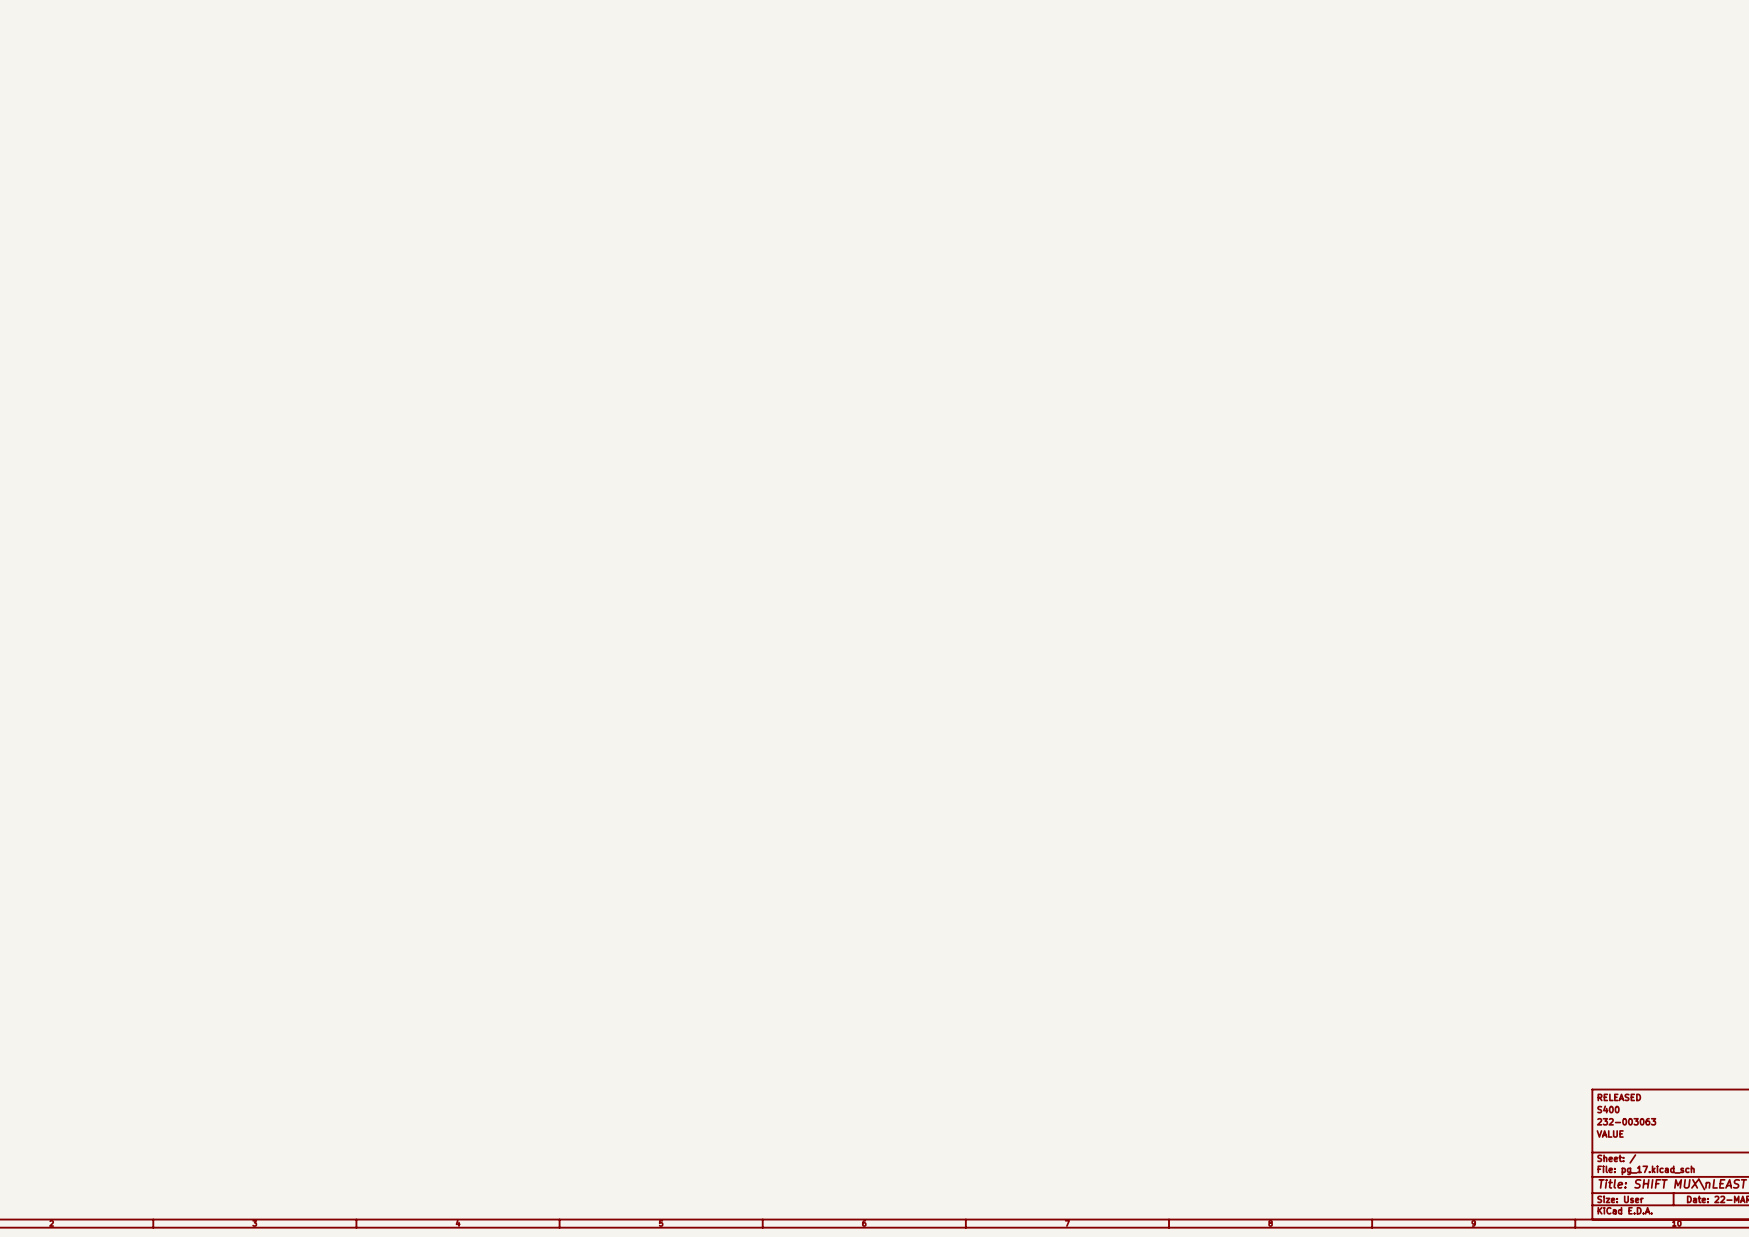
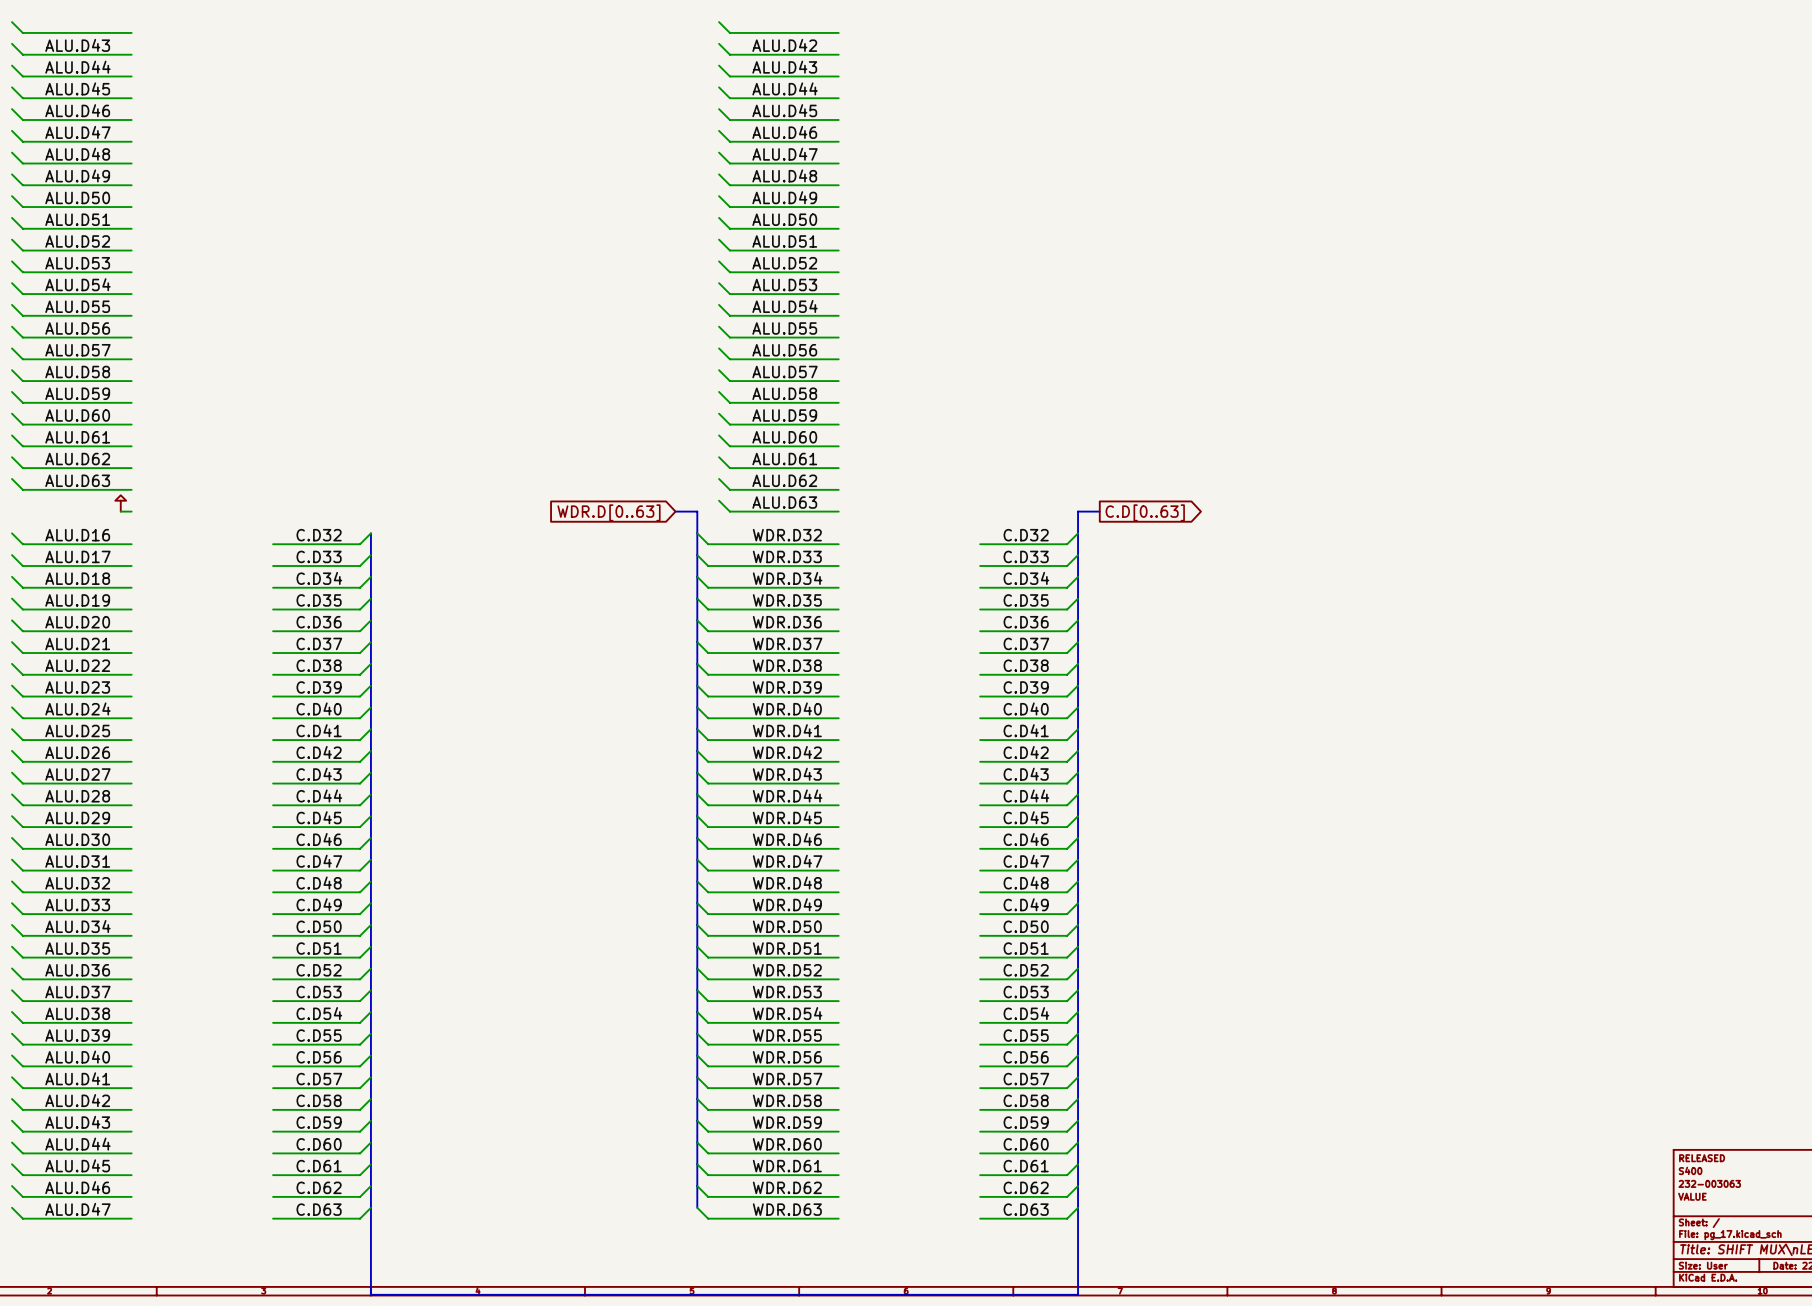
wire: none -> (11, 22) (22, 32) (131, 32)
wire: none -> (719, 22) (729, 32) (838, 32)
wire: none -> (11, 43) (22, 54) (131, 54)
wire: none -> (719, 43) (729, 54) (838, 54)
label: none -> ALU.D43 (77, 45)
label: none -> ALU.D42 (784, 45)
wire: none -> (11, 65) (22, 76) (131, 76)
wire: none -> (719, 65) (729, 76) (838, 76)
label: none -> ALU.D44 (77, 67)
label: none -> ALU.D43 (784, 67)
wire: none -> (11, 87) (22, 98) (131, 98)
wire: none -> (719, 87) (729, 98) (838, 98)
label: none -> ALU.D45 (77, 88)
label: none -> ALU.D44 (785, 88)
wire: none -> (11, 109) (22, 119) (131, 119)
wire: none -> (719, 109) (729, 119) (838, 119)
label: none -> ALU.D46 (77, 110)
label: none -> ALU.D45 (784, 110)
wire: none -> (11, 130) (22, 141) (131, 141)
wire: none -> (719, 130) (729, 141) (838, 141)
label: none -> ALU.D47 (77, 132)
label: none -> ALU.D46 (784, 132)
wire: none -> (11, 152) (22, 163) (131, 163)
wire: none -> (719, 152) (729, 163) (838, 163)
label: none -> ALU.D48 (77, 154)
label: none -> ALU.D47 (785, 154)
wire: none -> (11, 174) (22, 185) (131, 185)
wire: none -> (719, 174) (729, 185) (838, 185)
label: none -> ALU.D49 (77, 175)
label: none -> ALU.D48 (784, 175)
wire: none -> (11, 196) (22, 207) (131, 207)
wire: none -> (719, 196) (729, 207) (838, 207)
label: none -> ALU.D50 (77, 197)
label: none -> ALU.D49 (784, 197)
wire: none -> (11, 217) (22, 228) (131, 228)
wire: none -> (719, 217) (729, 228) (838, 228)
label: none -> ALU.D51 (77, 219)
label: none -> ALU.D50 (784, 219)
wire: none -> (11, 239) (22, 250) (131, 250)
wire: none -> (719, 239) (729, 250) (838, 250)
label: none -> ALU.D52 (77, 241)
label: none -> ALU.D51 (784, 241)
wire: none -> (11, 261) (22, 272) (131, 272)
wire: none -> (719, 261) (729, 272) (838, 272)
label: none -> ALU.D53 (77, 263)
label: none -> ALU.D52 (784, 263)
wire: none -> (11, 283) (22, 294) (131, 294)
wire: none -> (719, 283) (729, 294) (838, 294)
label: none -> ALU.D54 (77, 284)
label: none -> ALU.D53 (784, 284)
wire: none -> (11, 304) (22, 315) (131, 315)
wire: none -> (719, 304) (729, 315) (838, 315)
label: none -> ALU.D55 (77, 306)
label: none -> ALU.D54 (785, 306)
wire: none -> (11, 326) (22, 337) (131, 337)
wire: none -> (719, 326) (729, 337) (838, 337)
label: none -> ALU.D56 (77, 328)
label: none -> ALU.D55 (784, 328)
wire: none -> (11, 348) (22, 359) (131, 359)
wire: none -> (719, 348) (729, 359) (838, 359)
label: none -> ALU.D57 (77, 350)
label: none -> ALU.D56 (784, 350)
wire: none -> (11, 370) (22, 381) (131, 381)
wire: none -> (719, 370) (729, 381) (838, 381)
label: none -> ALU.D58 (77, 372)
label: none -> ALU.D57 (785, 372)
wire: none -> (11, 391) (22, 402) (131, 402)
wire: none -> (719, 391) (729, 402) (838, 402)
label: none -> ALU.D59 (77, 393)
label: none -> ALU.D58 (784, 393)
wire: none -> (11, 413) (22, 424) (131, 424)
wire: none -> (719, 413) (729, 424) (838, 424)
label: none -> ALU.D60 (77, 415)
label: none -> ALU.D59 (784, 415)
wire: none -> (11, 435) (22, 446) (131, 446)
wire: none -> (719, 435) (729, 446) (838, 446)
label: none -> ALU.D61 (77, 437)
label: none -> ALU.D60 (784, 437)
wire: none -> (11, 457) (22, 468) (131, 468)
wire: none -> (719, 457) (729, 468) (838, 468)
label: none -> ALU.D62 (77, 459)
label: none -> ALU.D61 (784, 459)
wire: none -> (11, 478) (22, 489) (131, 489)
wire: none -> (719, 478) (729, 489) (838, 489)
label: none -> ALU.D63 (77, 480)
label: none -> ALU.D62 (784, 480)
wire: none -> (719, 500) (729, 511) (838, 511)
label: none -> ALU.D63 (784, 502)
power symbol: none -> (120, 503)
wire: none -> (120, 511) (131, 511)
bus: none -> (675, 511) (697, 511) (697, 1207)
bus: none -> (1099, 511) (1078, 511) (1078, 1294) (370, 1294) (370, 533)
global label: none -> WDR.D[0..63] (609, 512)
global label: none -> C.D[0..63] (1145, 512)
wire: none -> (11, 533) (22, 544) (131, 544)
wire: none -> (370, 533) (360, 544) (273, 544)
wire: none -> (697, 533) (708, 544) (838, 544)
wire: none -> (1078, 533) (1067, 544) (980, 544)
label: none -> ALU.D16 (77, 535)
label: none -> C.D32 (319, 535)
label: none -> WDR.D32 (787, 535)
label: none -> C.D32 (1026, 535)
wire: none -> (11, 555) (22, 565) (131, 565)
wire: none -> (370, 555) (360, 565) (273, 565)
wire: none -> (697, 555) (708, 565) (838, 565)
wire: none -> (1078, 555) (1067, 565) (980, 565)
label: none -> ALU.D17 (77, 556)
label: none -> C.D33 (319, 556)
label: none -> WDR.D33 (787, 556)
label: none -> C.D33 (1026, 556)
wire: none -> (11, 576) (22, 587) (131, 587)
wire: none -> (370, 576) (360, 587) (273, 587)
wire: none -> (697, 576) (708, 587) (838, 587)
wire: none -> (1078, 576) (1067, 587) (980, 587)
label: none -> ALU.D18 (77, 578)
label: none -> C.D34 (319, 578)
label: none -> WDR.D34 (787, 578)
label: none -> C.D34 (1026, 578)
wire: none -> (11, 598) (22, 609) (131, 609)
wire: none -> (370, 598) (360, 609) (273, 609)
wire: none -> (697, 598) (708, 609) (838, 609)
wire: none -> (1078, 598) (1067, 609) (980, 609)
label: none -> ALU.D19 (77, 600)
label: none -> C.D35 (319, 600)
label: none -> WDR.D35 (787, 600)
label: none -> C.D35 (1026, 600)
wire: none -> (11, 620) (22, 631) (131, 631)
wire: none -> (370, 620) (360, 631) (273, 631)
wire: none -> (697, 620) (708, 631) (838, 631)
wire: none -> (1078, 620) (1067, 631) (980, 631)
label: none -> ALU.D20 (77, 622)
label: none -> C.D36 (319, 622)
label: none -> WDR.D36 (787, 622)
label: none -> C.D36 (1026, 622)
wire: none -> (11, 642) (22, 653) (131, 653)
wire: none -> (370, 642) (360, 653) (273, 653)
wire: none -> (697, 642) (708, 653) (838, 653)
wire: none -> (1078, 642) (1067, 653) (980, 653)
label: none -> ALU.D21 (77, 643)
label: none -> C.D37 (319, 643)
label: none -> WDR.D37 (787, 643)
label: none -> C.D37 (1026, 643)
wire: none -> (11, 663) (22, 674) (131, 674)
wire: none -> (370, 663) (360, 674) (273, 674)
wire: none -> (697, 663) (708, 674) (838, 674)
wire: none -> (1078, 663) (1067, 674) (980, 674)
label: none -> ALU.D22 (77, 665)
label: none -> C.D38 (319, 665)
label: none -> WDR.D38 (787, 665)
label: none -> C.D38 (1026, 665)
wire: none -> (11, 685) (22, 696) (131, 696)
wire: none -> (370, 685) (360, 696) (273, 696)
wire: none -> (697, 685) (708, 696) (838, 696)
wire: none -> (1078, 685) (1067, 696) (980, 696)
label: none -> ALU.D23 (77, 687)
label: none -> C.D39 (319, 687)
label: none -> WDR.D39 (787, 687)
label: none -> C.D39 (1026, 687)
wire: none -> (11, 707) (22, 718) (131, 718)
wire: none -> (370, 707) (360, 718) (273, 718)
wire: none -> (697, 707) (708, 718) (838, 718)
wire: none -> (1078, 707) (1067, 718) (980, 718)
label: none -> ALU.D24 (77, 708)
label: none -> C.D40 (319, 708)
label: none -> WDR.D40 (787, 708)
label: none -> C.D40 (1026, 708)
wire: none -> (11, 729) (22, 740) (131, 740)
wire: none -> (370, 729) (360, 740) (273, 740)
wire: none -> (697, 729) (708, 740) (838, 740)
wire: none -> (1078, 729) (1067, 740) (980, 740)
label: none -> C.D41 (319, 730)
label: none -> WDR.D41 (787, 730)
label: none -> C.D41 (1026, 730)
label: none -> ALU.D25 (77, 730)
wire: none -> (11, 750) (22, 761) (131, 761)
wire: none -> (370, 750) (360, 761) (273, 761)
wire: none -> (697, 750) (708, 761) (838, 761)
wire: none -> (1078, 750) (1067, 761) (980, 761)
label: none -> ALU.D26 (77, 752)
label: none -> C.D42 (319, 752)
label: none -> WDR.D42 (787, 752)
label: none -> C.D42 (1026, 752)
wire: none -> (11, 772) (22, 783) (131, 783)
wire: none -> (370, 772) (360, 783) (273, 783)
wire: none -> (697, 772) (708, 783) (838, 783)
wire: none -> (1078, 772) (1067, 783) (980, 783)
label: none -> ALU.D27 (77, 774)
label: none -> C.D43 (319, 774)
label: none -> WDR.D43 (787, 774)
label: none -> C.D43 (1026, 774)
wire: none -> (11, 794) (22, 805) (131, 805)
wire: none -> (370, 794) (360, 805) (273, 805)
wire: none -> (697, 794) (708, 805) (838, 805)
wire: none -> (1078, 794) (1067, 805) (980, 805)
label: none -> C.D44 (319, 795)
label: none -> WDR.D44 (787, 795)
label: none -> C.D44 (1026, 795)
label: none -> ALU.D28 (77, 796)
wire: none -> (11, 816) (22, 827) (131, 827)
wire: none -> (370, 816) (360, 827) (273, 827)
wire: none -> (697, 816) (708, 827) (838, 827)
wire: none -> (1078, 816) (1067, 827) (980, 827)
label: none -> ALU.D29 (77, 818)
label: none -> C.D45 (319, 817)
label: none -> WDR.D45 (787, 817)
label: none -> C.D45 (1026, 817)
wire: none -> (11, 837) (22, 848) (131, 848)
wire: none -> (370, 837) (360, 848) (273, 848)
wire: none -> (697, 837) (708, 848) (838, 848)
wire: none -> (1078, 837) (1067, 848) (980, 848)
label: none -> ALU.D30 (77, 839)
label: none -> C.D46 (319, 839)
label: none -> WDR.D46 (787, 839)
label: none -> C.D46 (1026, 839)
wire: none -> (11, 859) (22, 870) (131, 870)
wire: none -> (370, 859) (360, 870) (273, 870)
wire: none -> (697, 859) (708, 870) (838, 870)
wire: none -> (1078, 859) (1067, 870) (980, 870)
label: none -> ALU.D31 (77, 861)
label: none -> C.D47 (319, 861)
label: none -> WDR.D47 (787, 861)
label: none -> C.D47 (1026, 861)
wire: none -> (11, 881) (22, 892) (131, 892)
wire: none -> (370, 881) (360, 892) (273, 892)
wire: none -> (697, 881) (708, 892) (838, 892)
wire: none -> (1078, 881) (1067, 892) (980, 892)
label: none -> ALU.D32 (77, 883)
label: none -> C.D48 (319, 883)
label: none -> WDR.D48 (787, 883)
label: none -> C.D48 (1026, 883)
wire: none -> (11, 903) (22, 914) (131, 914)
wire: none -> (370, 903) (360, 914) (273, 914)
wire: none -> (697, 903) (708, 914) (838, 914)
wire: none -> (1078, 903) (1067, 914) (980, 914)
label: none -> C.D49 (319, 904)
label: none -> WDR.D49 (787, 904)
label: none -> C.D49 (1026, 904)
label: none -> ALU.D33 (77, 905)
wire: none -> (11, 924) (22, 935) (131, 935)
wire: none -> (370, 924) (360, 935) (273, 935)
wire: none -> (697, 924) (708, 935) (838, 935)
wire: none -> (1078, 924) (1067, 935) (980, 935)
label: none -> ALU.D34 (77, 926)
label: none -> C.D50 (319, 926)
label: none -> WDR.D50 (787, 926)
label: none -> C.D50 (1026, 926)
wire: none -> (11, 946) (22, 957) (131, 957)
wire: none -> (370, 946) (360, 957) (273, 957)
wire: none -> (697, 946) (708, 957) (838, 957)
wire: none -> (1078, 946) (1067, 957) (980, 957)
label: none -> ALU.D35 (77, 948)
label: none -> C.D51 (319, 948)
label: none -> WDR.D51 (787, 948)
label: none -> C.D51 (1026, 948)
wire: none -> (11, 968) (22, 979) (131, 979)
wire: none -> (370, 968) (360, 979) (273, 979)
wire: none -> (697, 968) (708, 979) (838, 979)
wire: none -> (1078, 968) (1067, 979) (980, 979)
label: none -> ALU.D36 (77, 970)
label: none -> C.D52 (319, 970)
label: none -> WDR.D52 (787, 970)
label: none -> C.D52 (1026, 970)
wire: none -> (11, 990) (22, 1001) (131, 1001)
wire: none -> (370, 990) (360, 1001) (273, 1001)
wire: none -> (697, 990) (708, 1001) (838, 1001)
wire: none -> (1078, 990) (1067, 1001) (980, 1001)
label: none -> ALU.D37 (77, 992)
label: none -> C.D53 (319, 992)
label: none -> WDR.D53 (787, 992)
label: none -> C.D53 (1026, 992)
wire: none -> (11, 1011) (22, 1022) (131, 1022)
wire: none -> (370, 1011) (360, 1022) (273, 1022)
wire: none -> (697, 1011) (708, 1022) (838, 1022)
wire: none -> (1078, 1011) (1067, 1022) (980, 1022)
label: none -> ALU.D38 (77, 1013)
label: none -> C.D54 (319, 1013)
label: none -> WDR.D54 (787, 1013)
label: none -> C.D54 (1026, 1013)
wire: none -> (11, 1033) (22, 1044) (131, 1044)
wire: none -> (370, 1033) (360, 1044) (273, 1044)
wire: none -> (697, 1033) (708, 1044) (838, 1044)
wire: none -> (1078, 1033) (1067, 1044) (980, 1044)
label: none -> ALU.D39 (77, 1035)
label: none -> C.D55 (319, 1035)
label: none -> WDR.D55 (787, 1035)
label: none -> C.D55 (1026, 1035)
wire: none -> (11, 1055) (22, 1066) (131, 1066)
wire: none -> (370, 1055) (360, 1066) (273, 1066)
wire: none -> (697, 1055) (708, 1066) (838, 1066)
wire: none -> (1078, 1055) (1067, 1066) (980, 1066)
label: none -> ALU.D40 (77, 1057)
label: none -> C.D56 (319, 1057)
label: none -> WDR.D56 (787, 1057)
label: none -> C.D56 (1026, 1057)
wire: none -> (11, 1077) (22, 1088) (131, 1088)
wire: none -> (370, 1077) (360, 1088) (273, 1088)
wire: none -> (697, 1077) (708, 1088) (838, 1088)
wire: none -> (1078, 1077) (1067, 1088) (980, 1088)
label: none -> ALU.D41 (77, 1078)
label: none -> C.D57 (319, 1079)
label: none -> WDR.D57 (787, 1079)
label: none -> C.D57 (1026, 1079)
wire: none -> (11, 1099) (22, 1109) (131, 1109)
wire: none -> (370, 1099) (360, 1109) (273, 1109)
wire: none -> (697, 1099) (708, 1109) (838, 1109)
wire: none -> (1078, 1099) (1067, 1109) (980, 1109)
label: none -> ALU.D42 (77, 1100)
label: none -> C.D58 (319, 1100)
label: none -> WDR.D58 (787, 1100)
label: none -> C.D58 (1026, 1100)
wire: none -> (11, 1120) (22, 1131) (131, 1131)
wire: none -> (370, 1120) (360, 1131) (273, 1131)
wire: none -> (697, 1120) (708, 1131) (838, 1131)
wire: none -> (1078, 1120) (1067, 1131) (980, 1131)
label: none -> ALU.D43 (77, 1122)
label: none -> C.D59 (319, 1122)
label: none -> WDR.D59 (787, 1122)
label: none -> C.D59 (1026, 1122)
wire: none -> (11, 1142) (22, 1153) (131, 1153)
wire: none -> (370, 1142) (360, 1153) (273, 1153)
wire: none -> (697, 1142) (708, 1153) (838, 1153)
wire: none -> (1078, 1142) (1067, 1153) (980, 1153)
label: none -> ALU.D44 (77, 1144)
label: none -> C.D60 (319, 1144)
label: none -> WDR.D60 (787, 1144)
label: none -> C.D60 (1026, 1144)
wire: none -> (11, 1164) (22, 1175) (131, 1175)
wire: none -> (370, 1164) (360, 1175) (273, 1175)
wire: none -> (697, 1164) (708, 1175) (838, 1175)
wire: none -> (1078, 1164) (1067, 1175) (980, 1175)
label: none -> ALU.D45 (77, 1165)
label: none -> C.D61 (319, 1166)
label: none -> WDR.D61 (787, 1166)
label: none -> C.D61 (1026, 1166)
wire: none -> (11, 1186) (22, 1196) (131, 1196)
wire: none -> (370, 1186) (360, 1196) (273, 1196)
wire: none -> (697, 1186) (708, 1196) (838, 1196)
wire: none -> (1078, 1186) (1067, 1196) (980, 1196)
label: none -> ALU.D46 (77, 1187)
label: none -> C.D62 (319, 1187)
label: none -> WDR.D62 (787, 1187)
label: none -> C.D62 (1026, 1187)
wire: none -> (11, 1207) (22, 1218) (131, 1218)
wire: none -> (370, 1207) (360, 1218) (273, 1218)
wire: none -> (697, 1207) (708, 1218) (838, 1218)
wire: none -> (1078, 1207) (1067, 1218) (980, 1218)
label: none -> ALU.D47 (77, 1209)
label: none -> C.D63 (319, 1209)
label: none -> WDR.D63 (787, 1209)
label: none -> C.D63 (1026, 1209)

